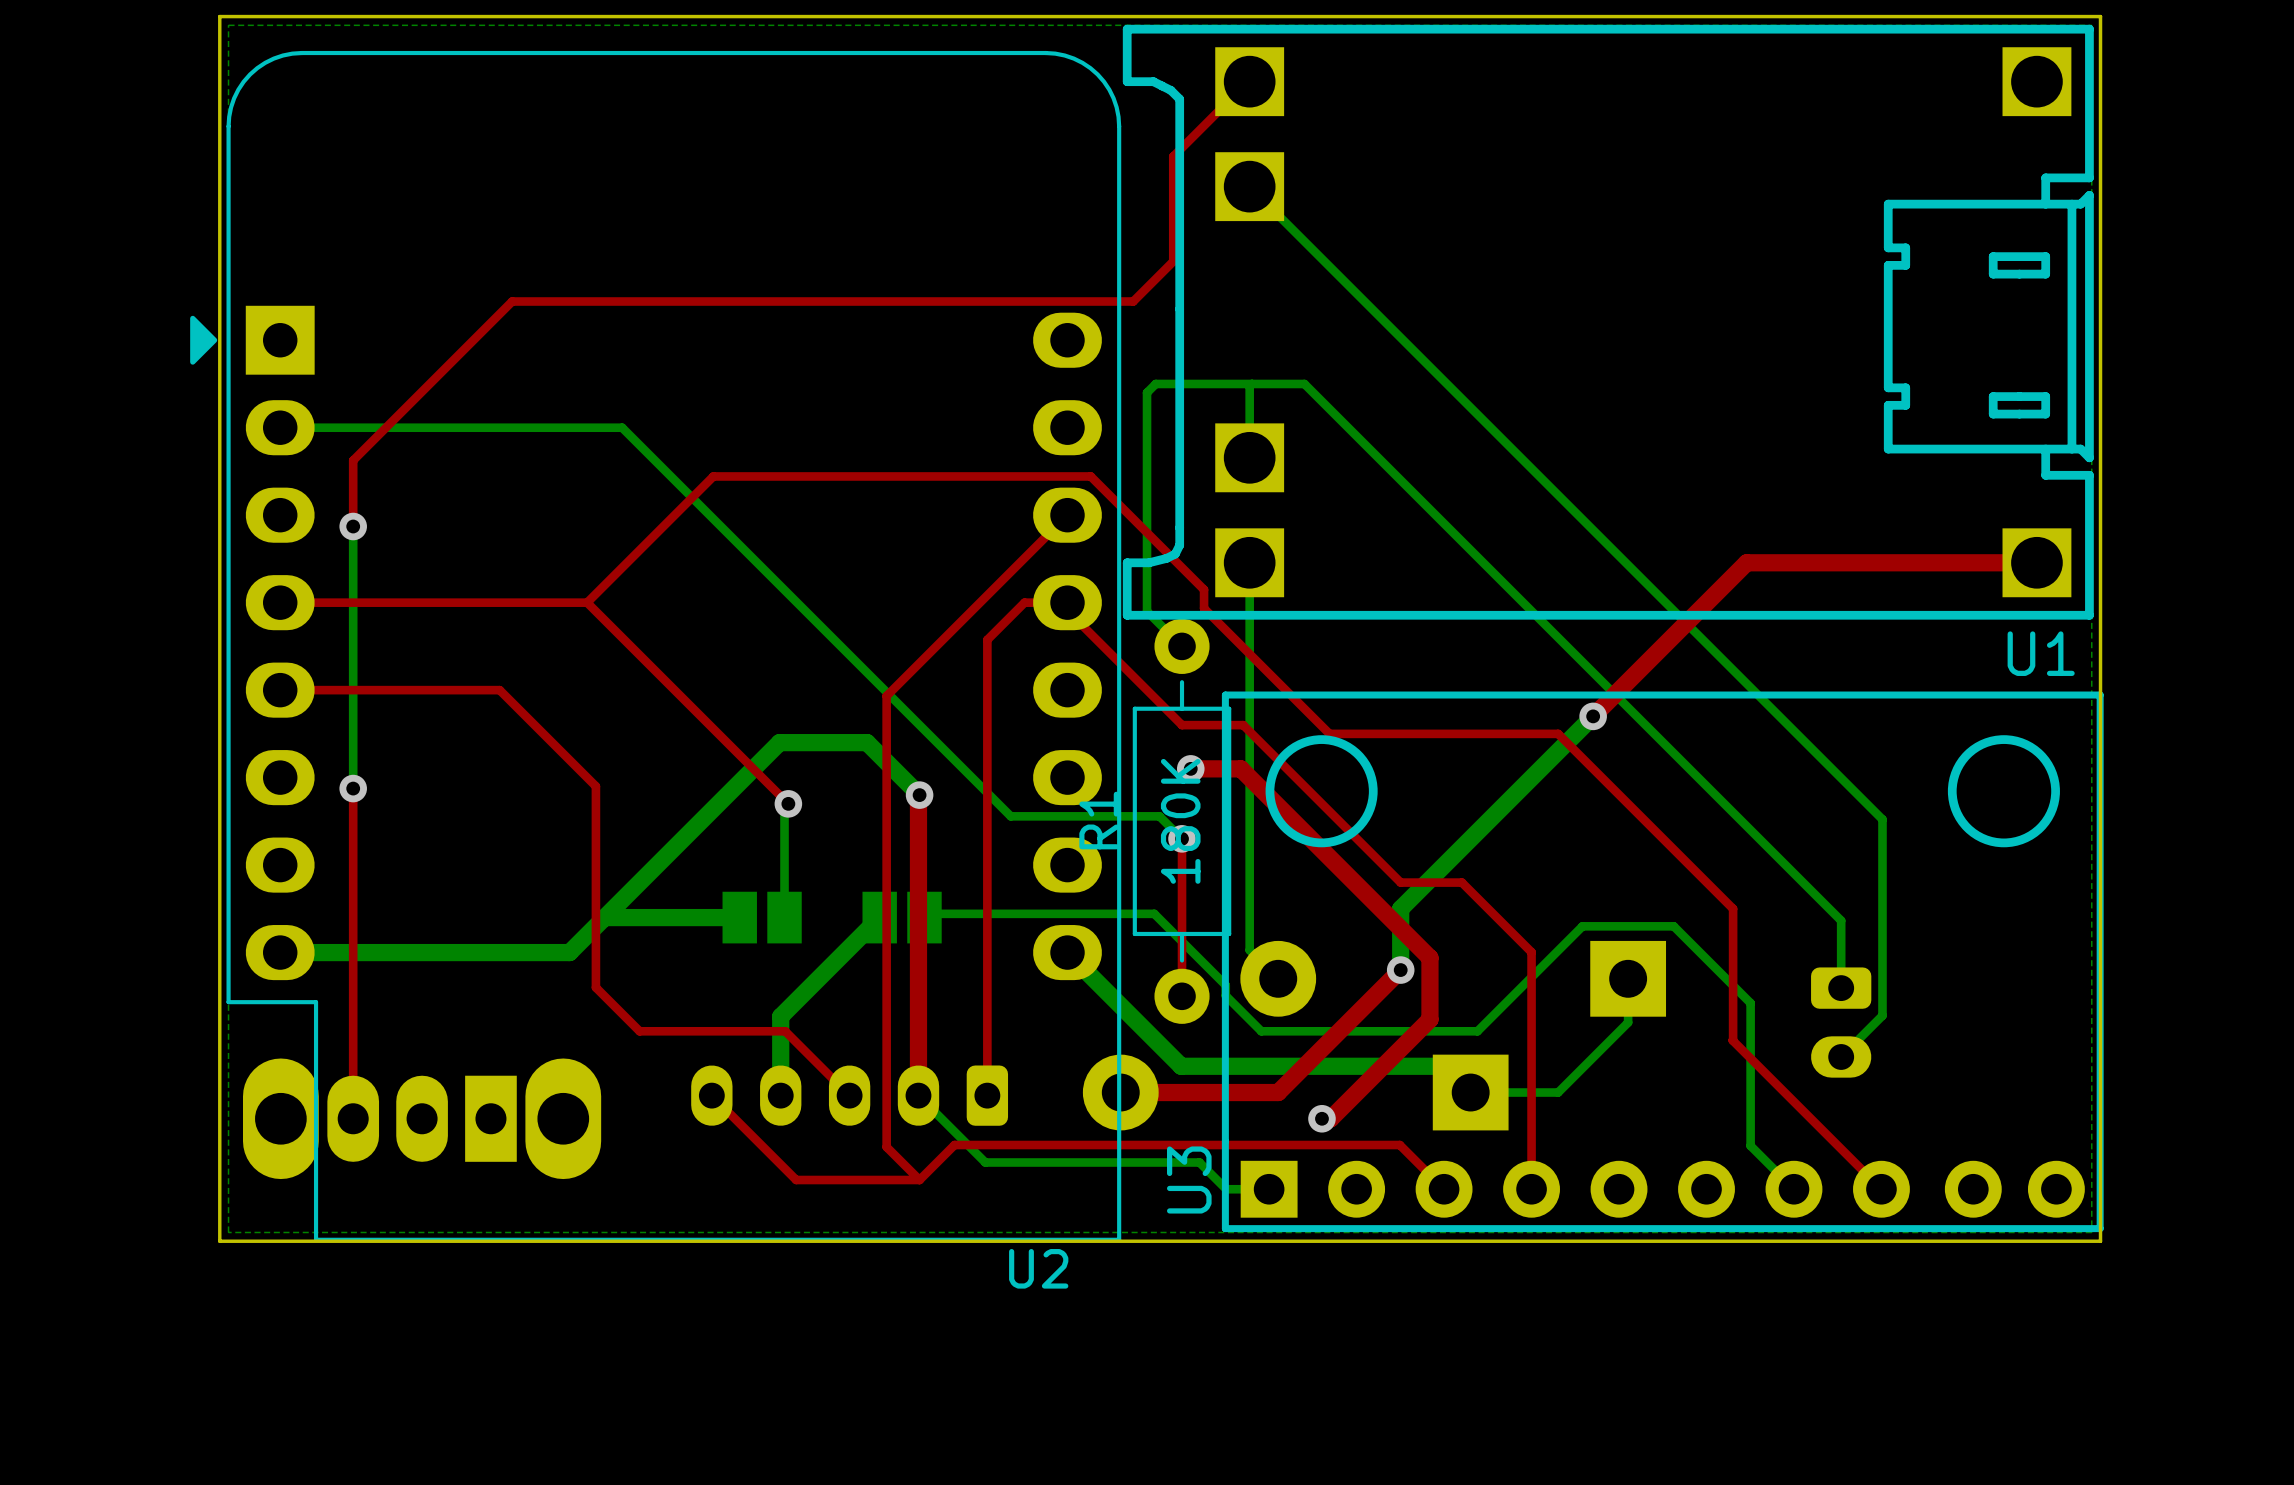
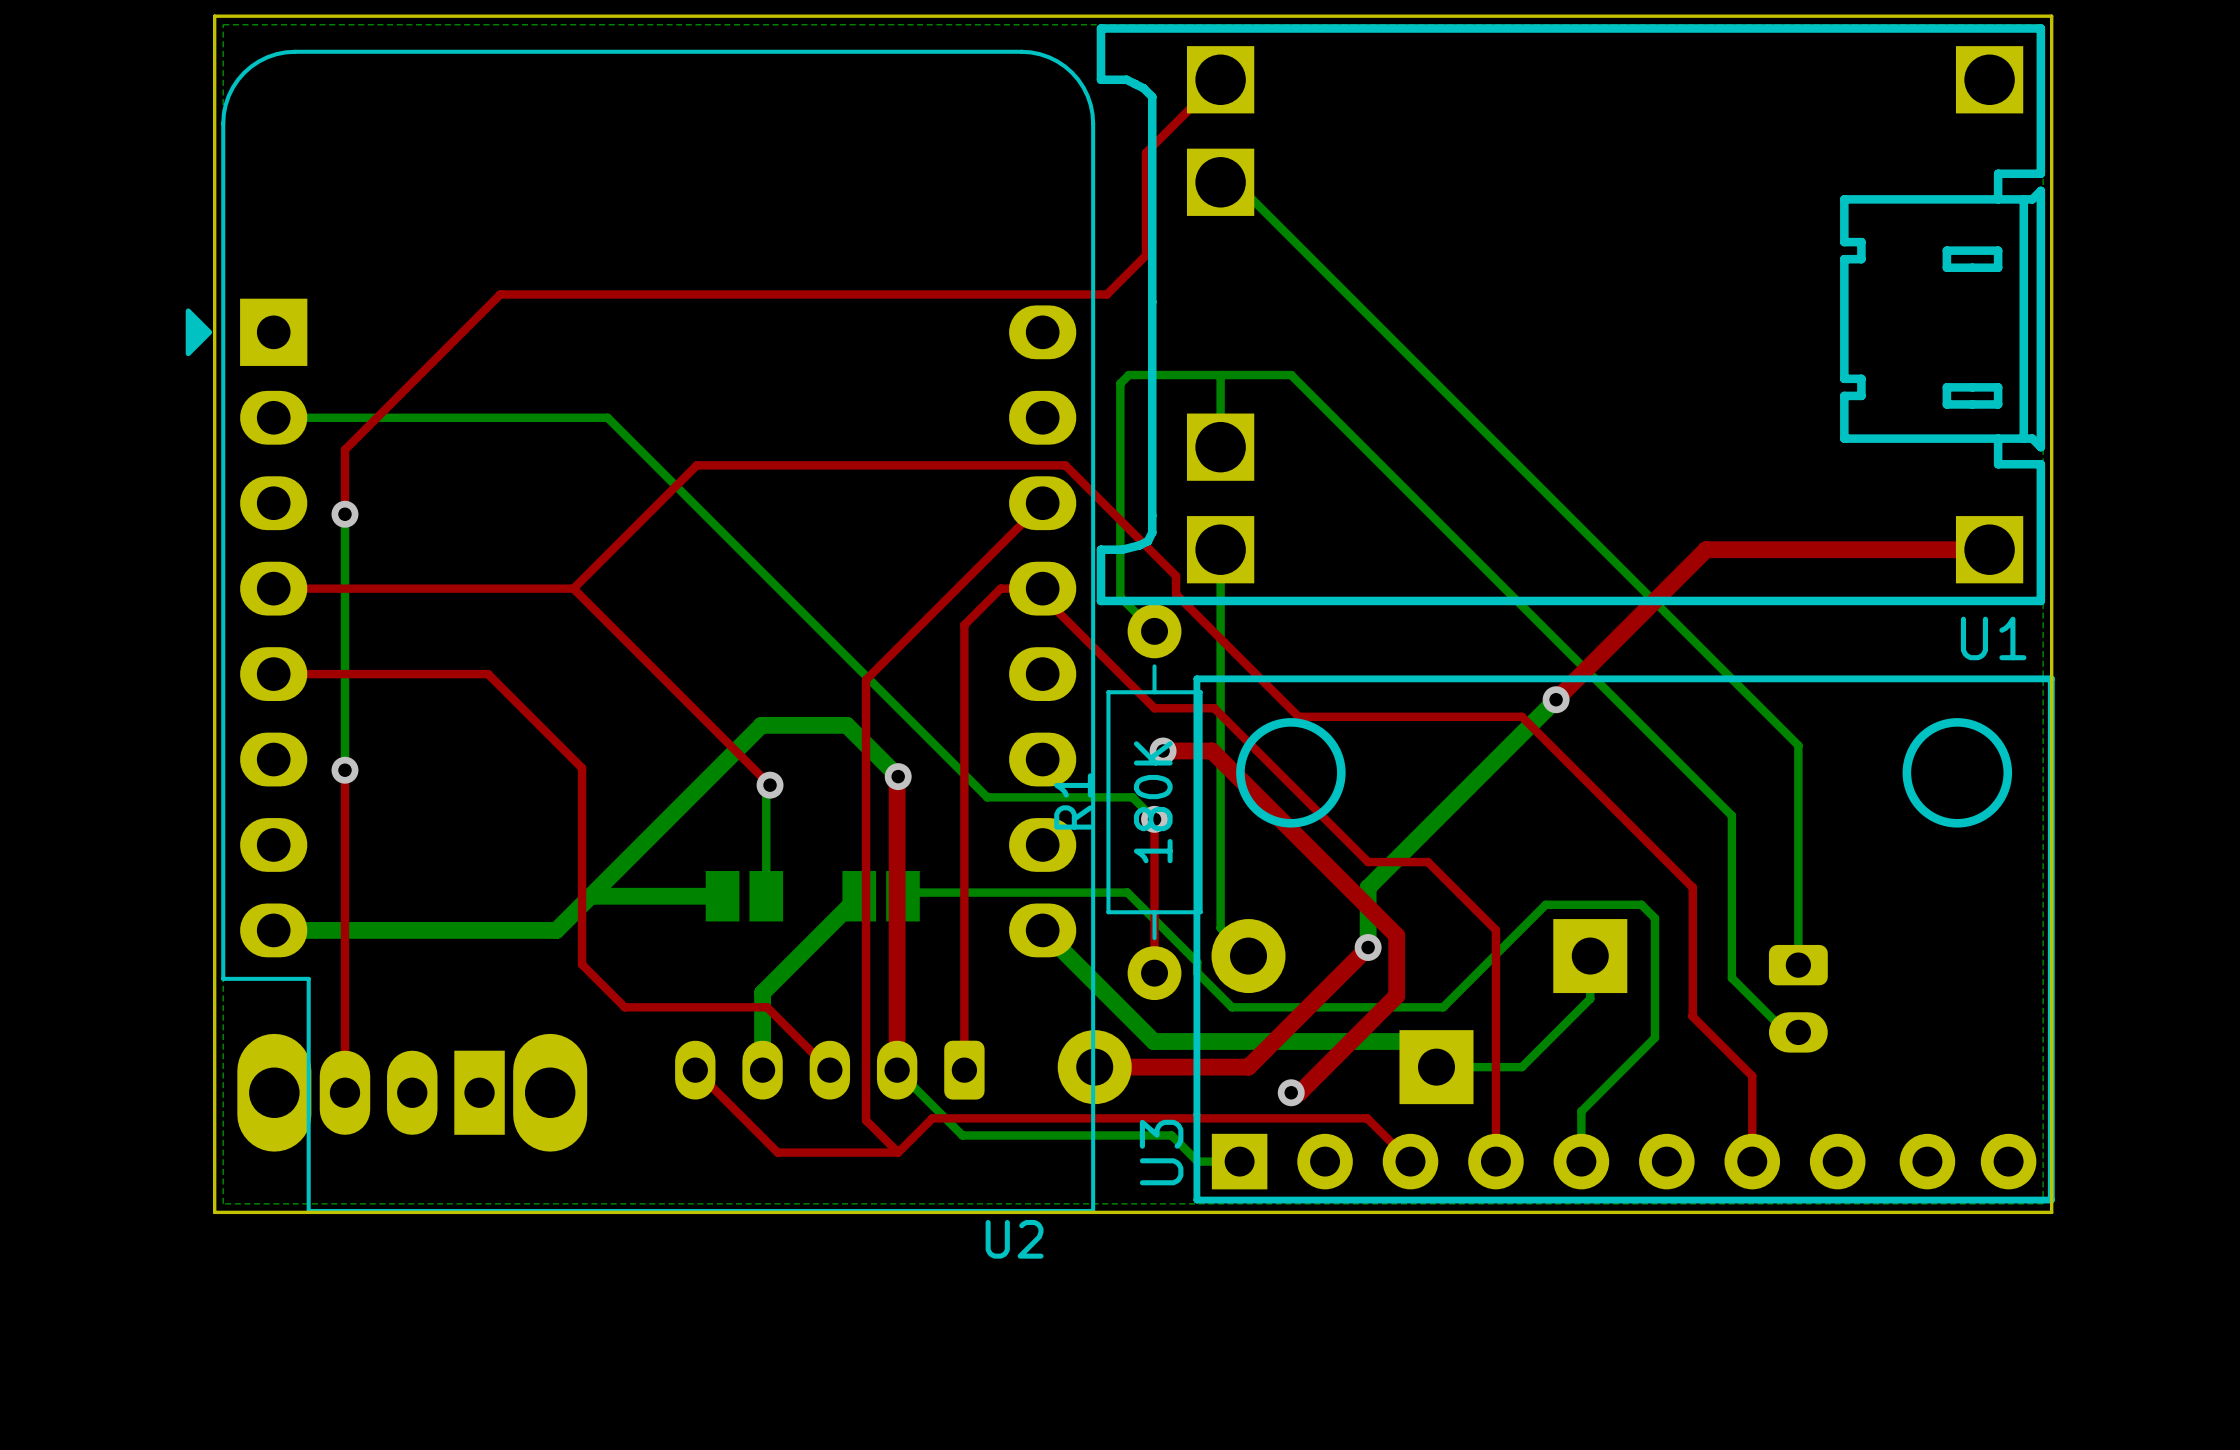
bottom track: (1249, 186) (1882, 819) (1882, 1015) (1841, 1056) -> (1220, 182) (1235, 182) (1798, 745) (1798, 899)
bottom track: (1304, 383) (1841, 920) -> (1274, 375) (1291, 375) (1731, 815) (1731, 978) (1786, 1032) (1798, 1032)
bottom track: (1673, 926) (1750, 1003) (1750, 1145) (1793, 1189) -> (1634, 904) (1641, 904) (1654, 918) (1654, 1037) (1581, 1111) (1581, 1161)
top track: (1793, 1101) (1881, 1189) -> (1752, 1076) (1752, 1161)

